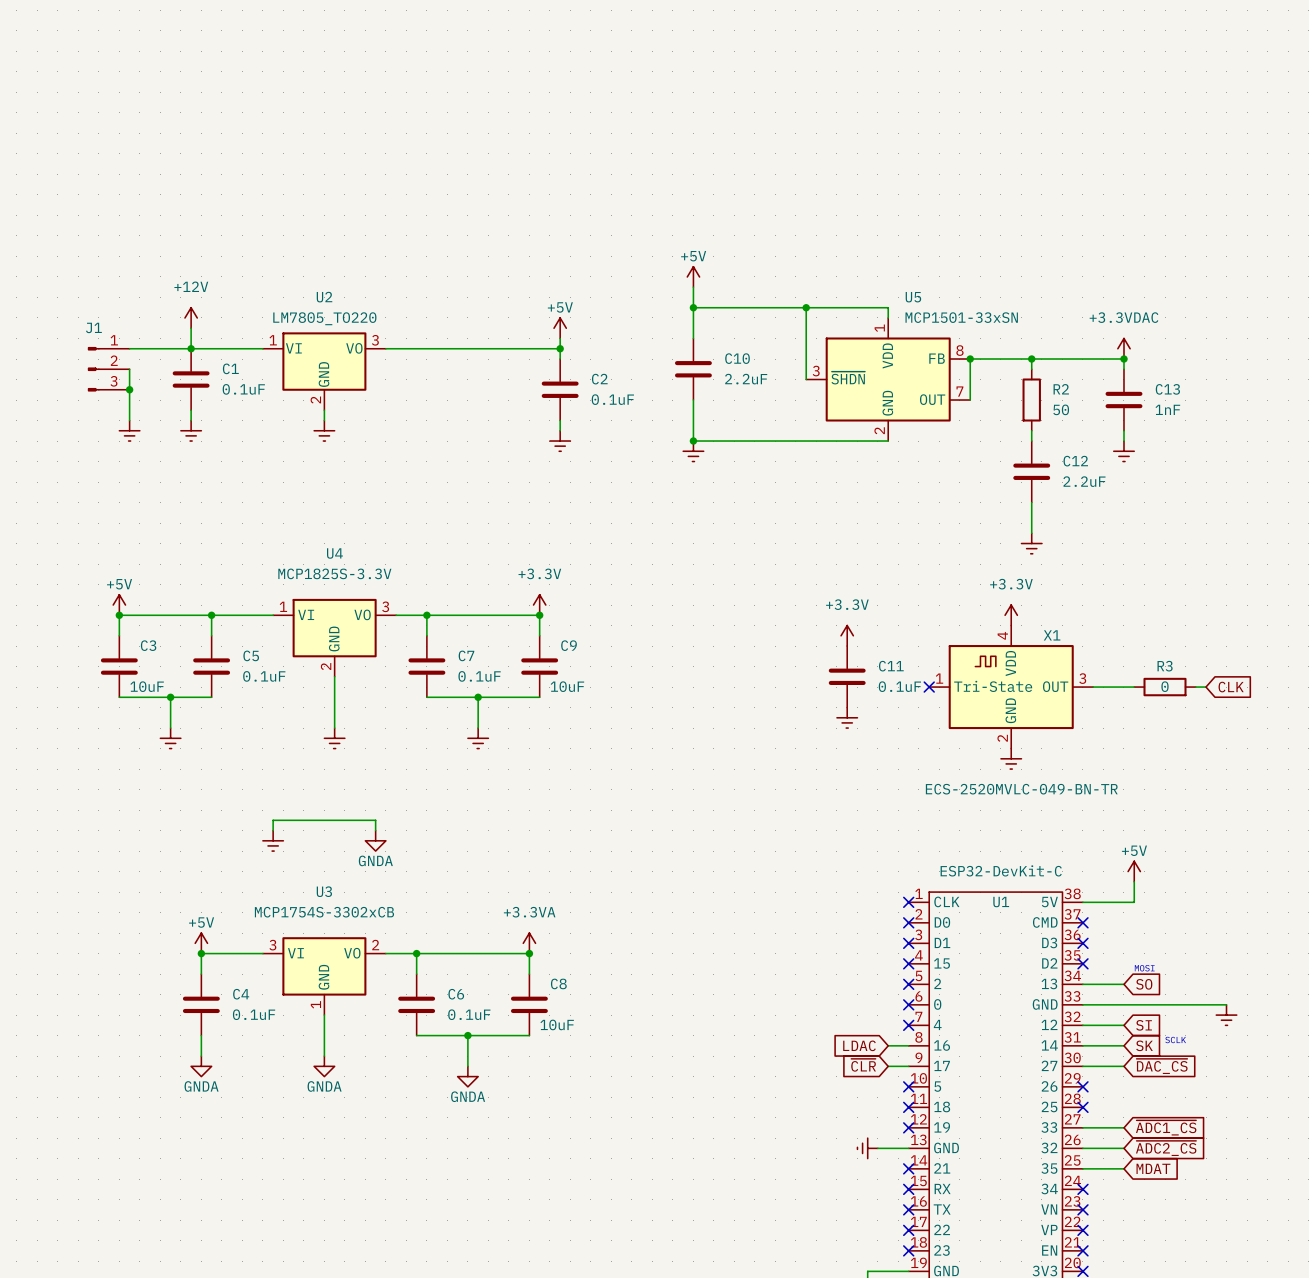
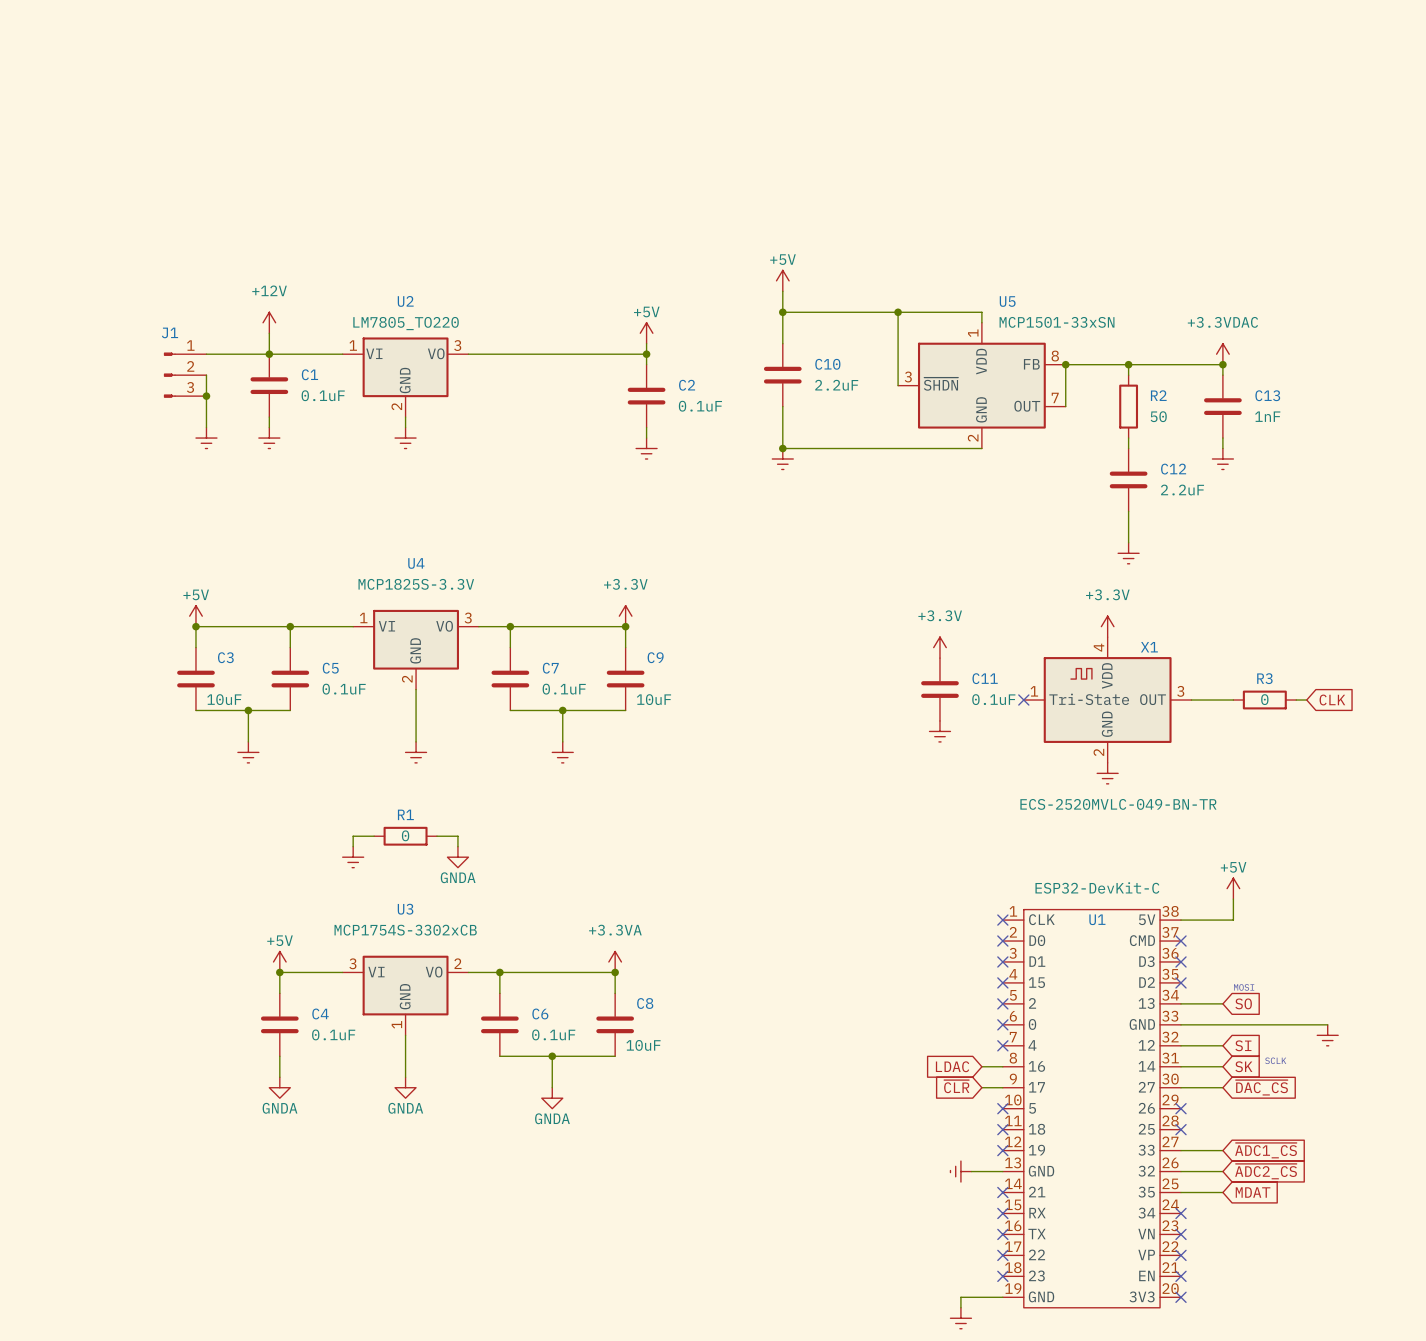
wire: (293, 820) (355, 820) -> none
R1: none -> 0 (405, 836)

